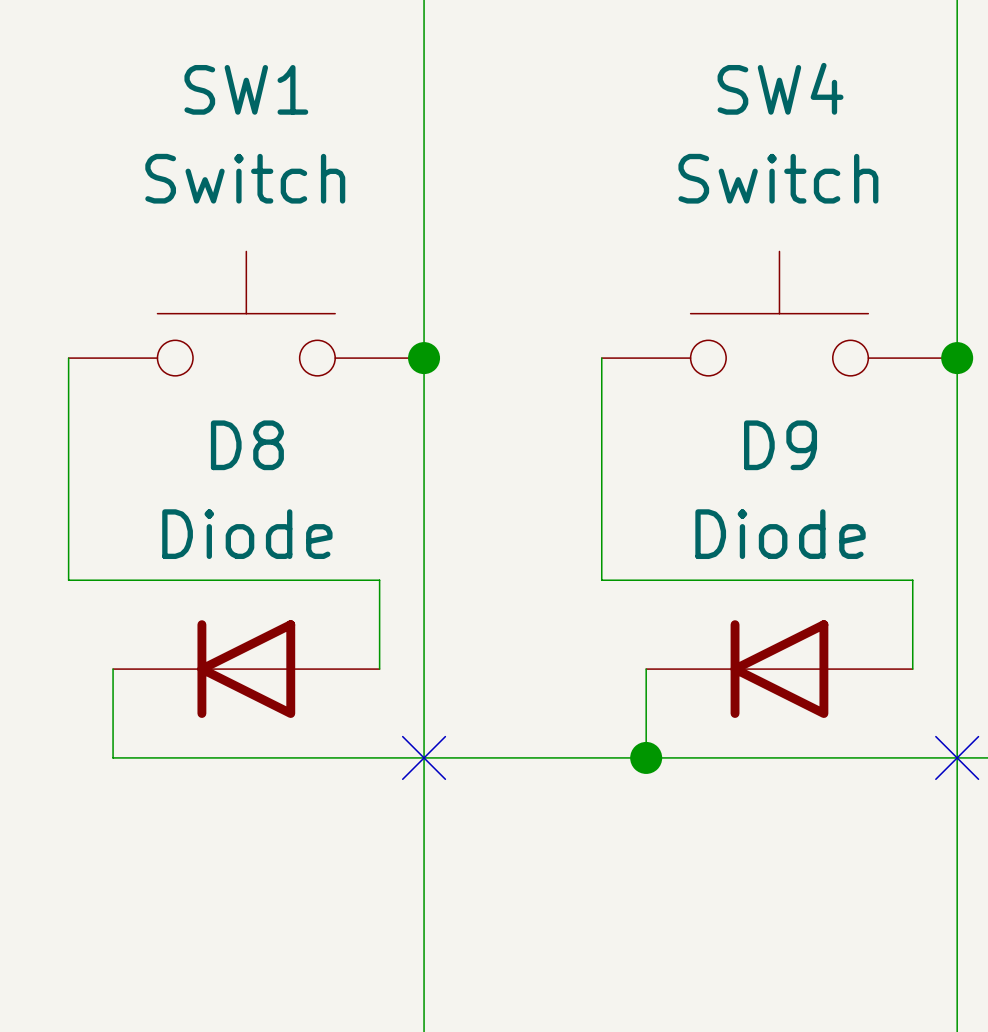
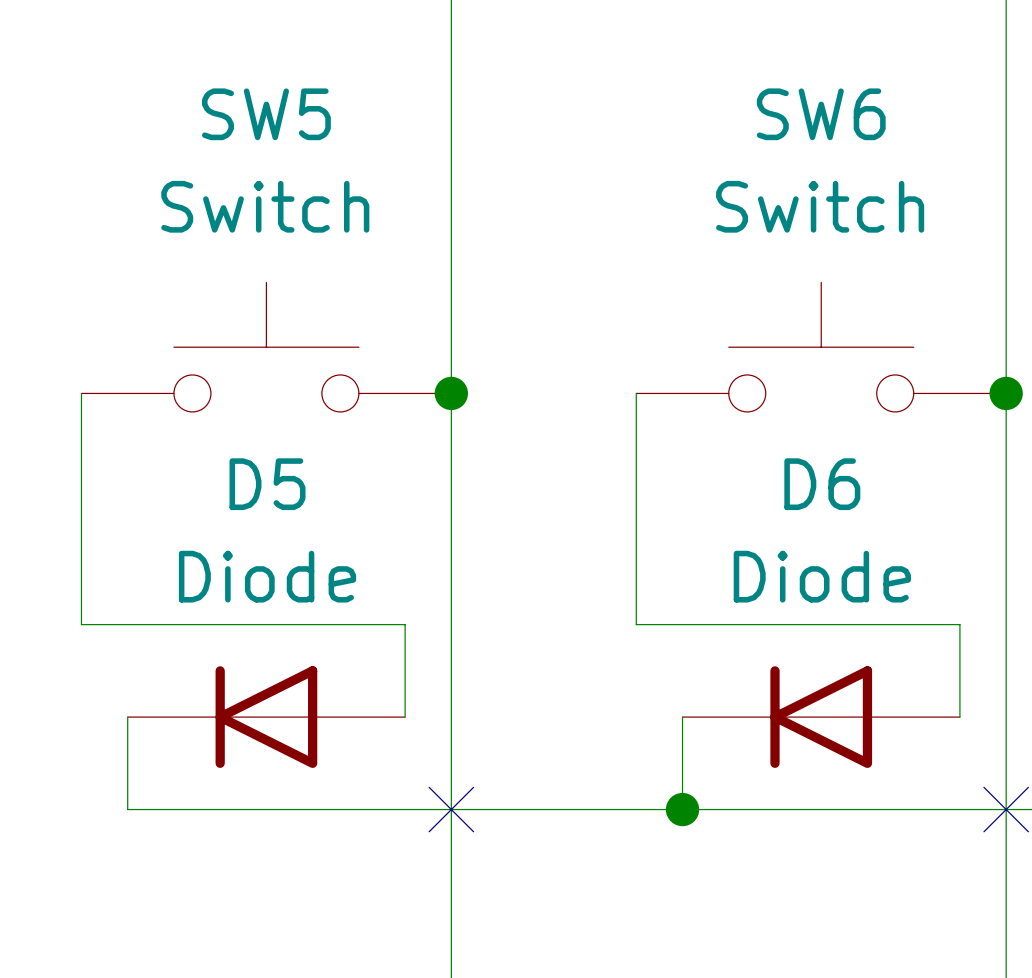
SW4 name: SW4 (780, 88) -> SW6 (821, 114)
SW1 name: SW1 (246, 89) -> SW5 (266, 114)
D8 name: D8 (247, 445) -> D5 (267, 484)
D9 name: D9 (780, 445) -> D6 (822, 484)

